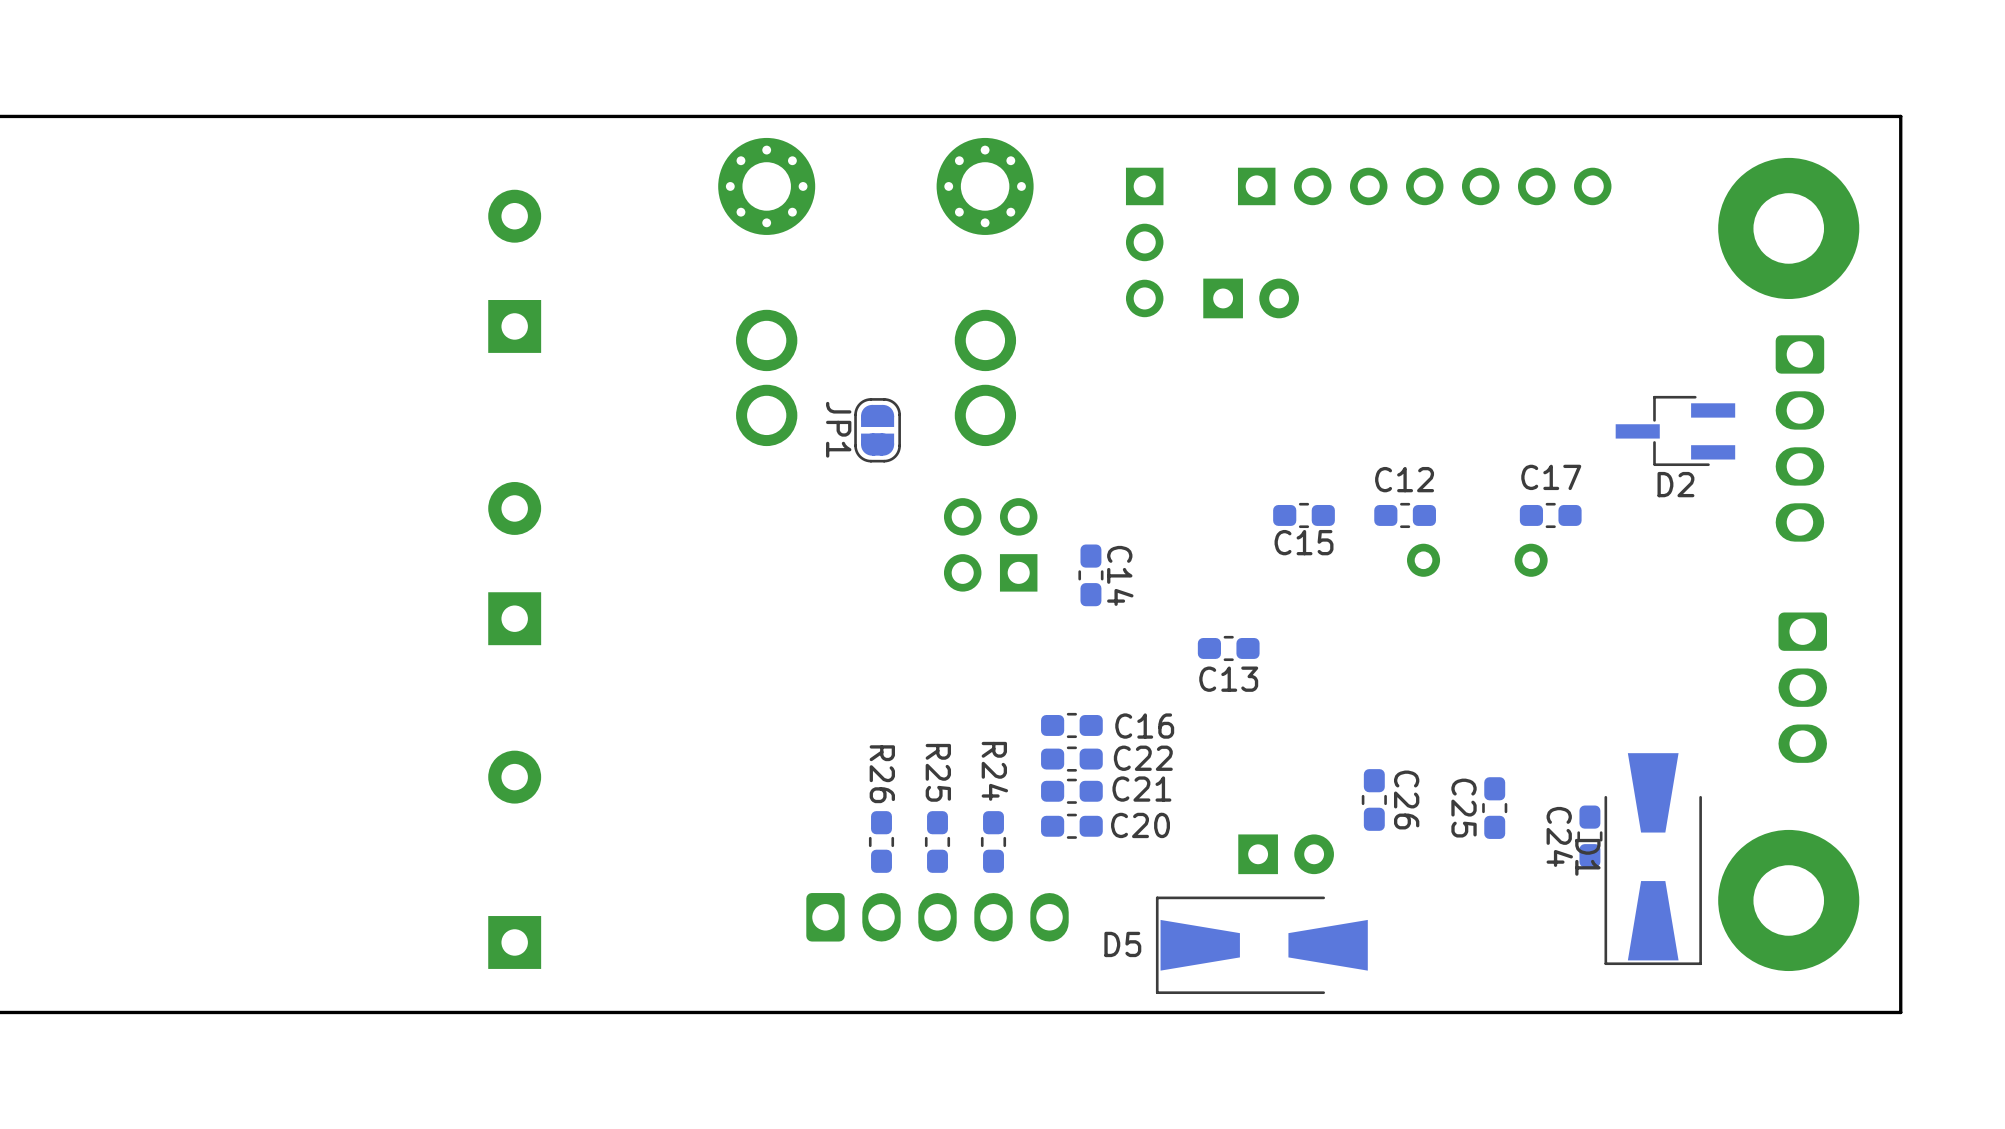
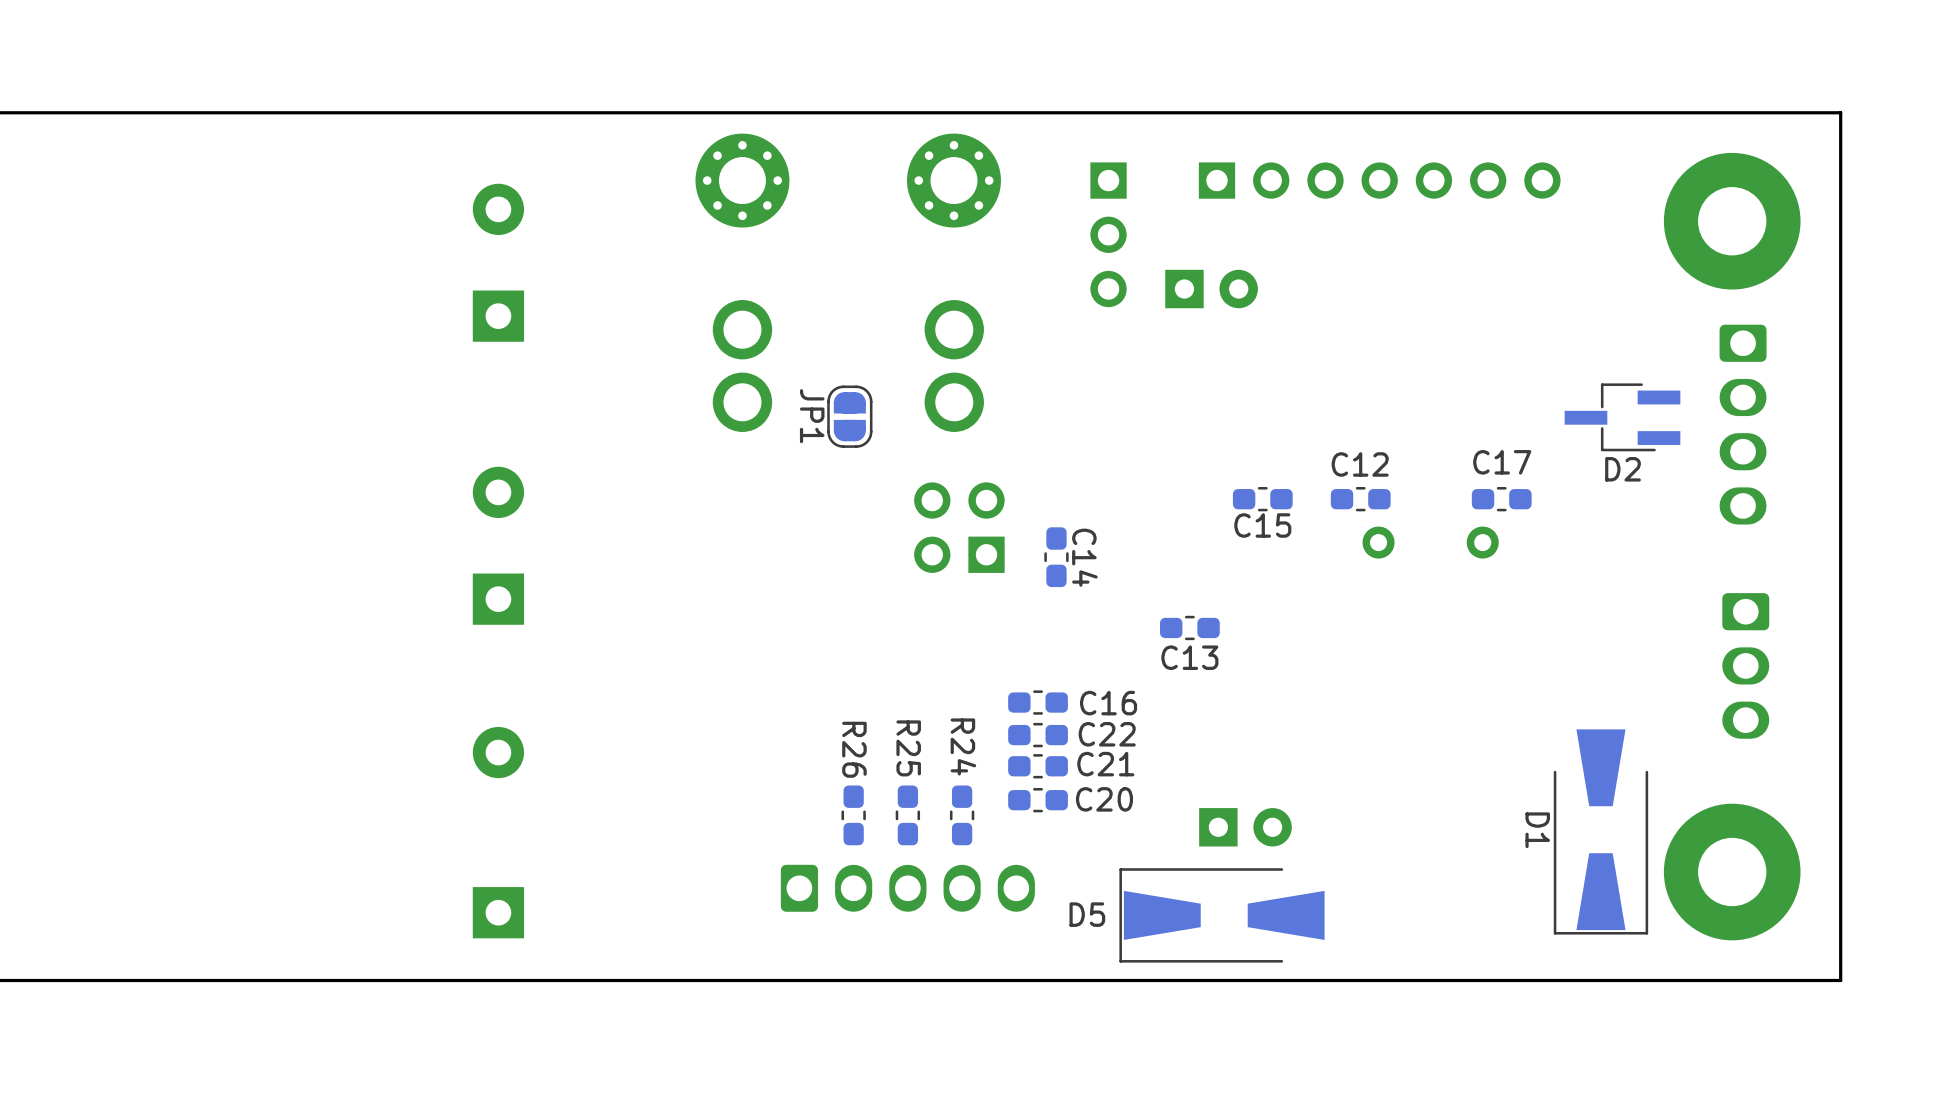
C26: (1374, 799) -> none
C25: (1494, 808) -> none
C24: (1589, 836) -> none

